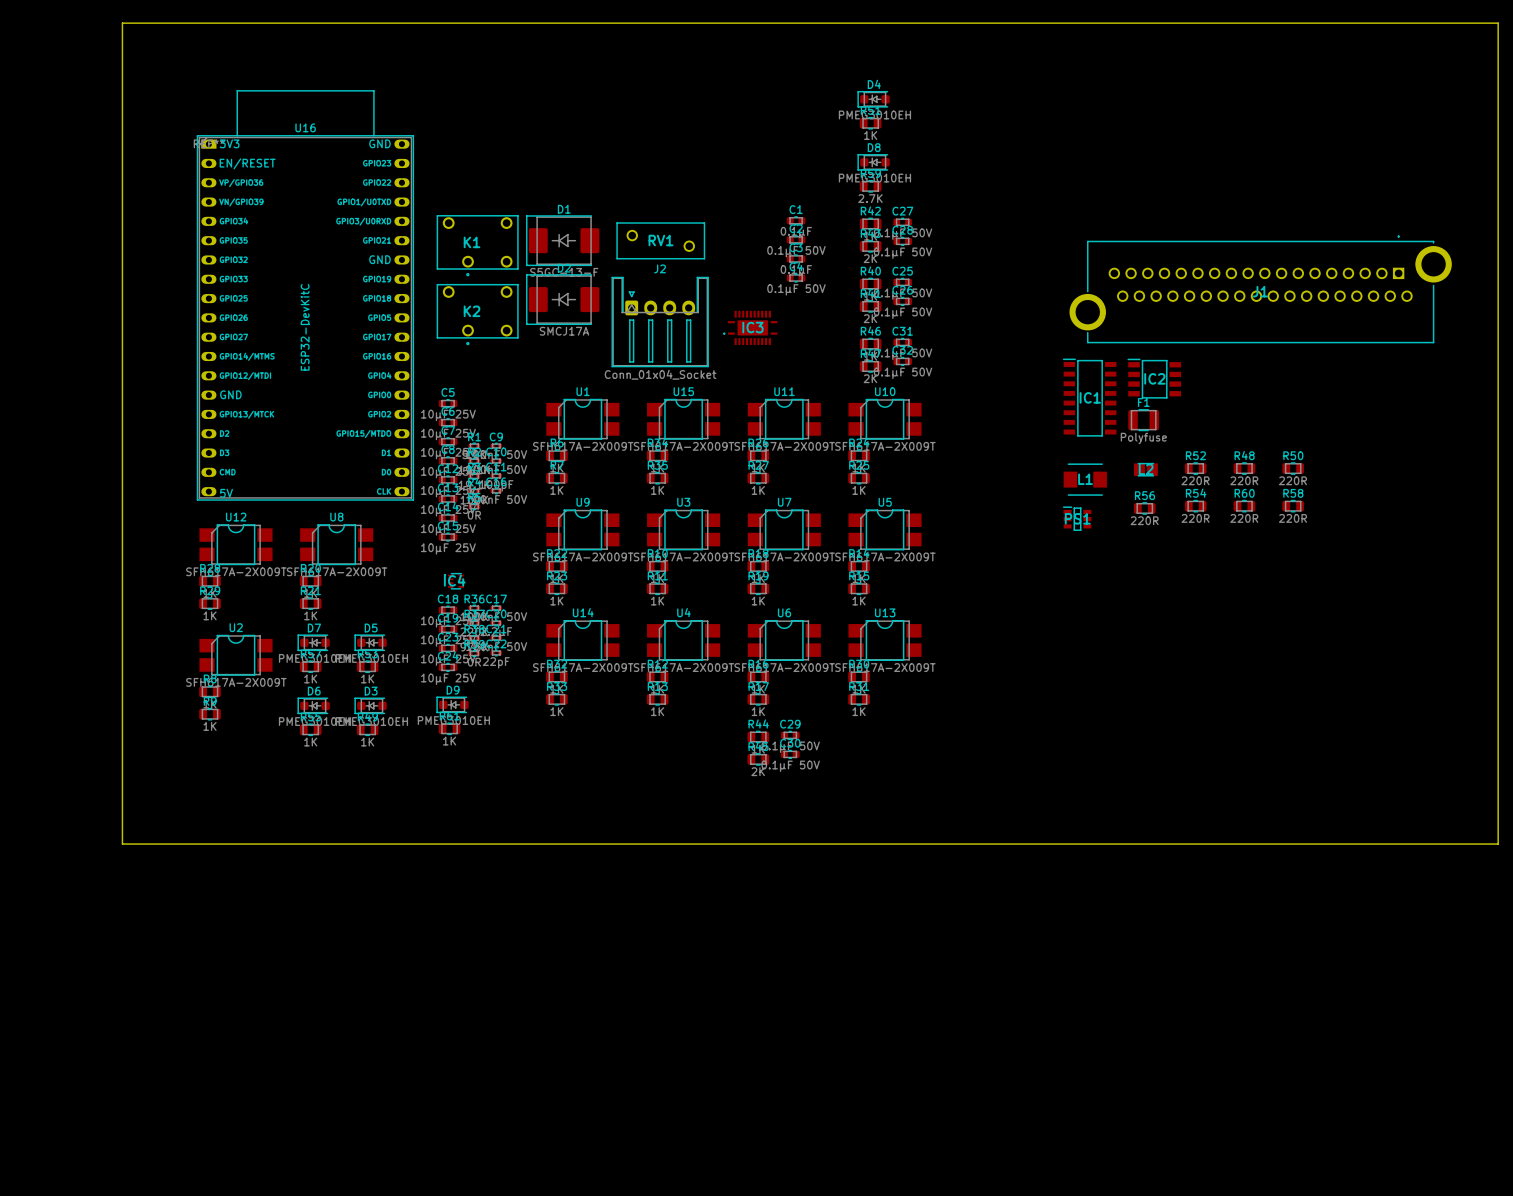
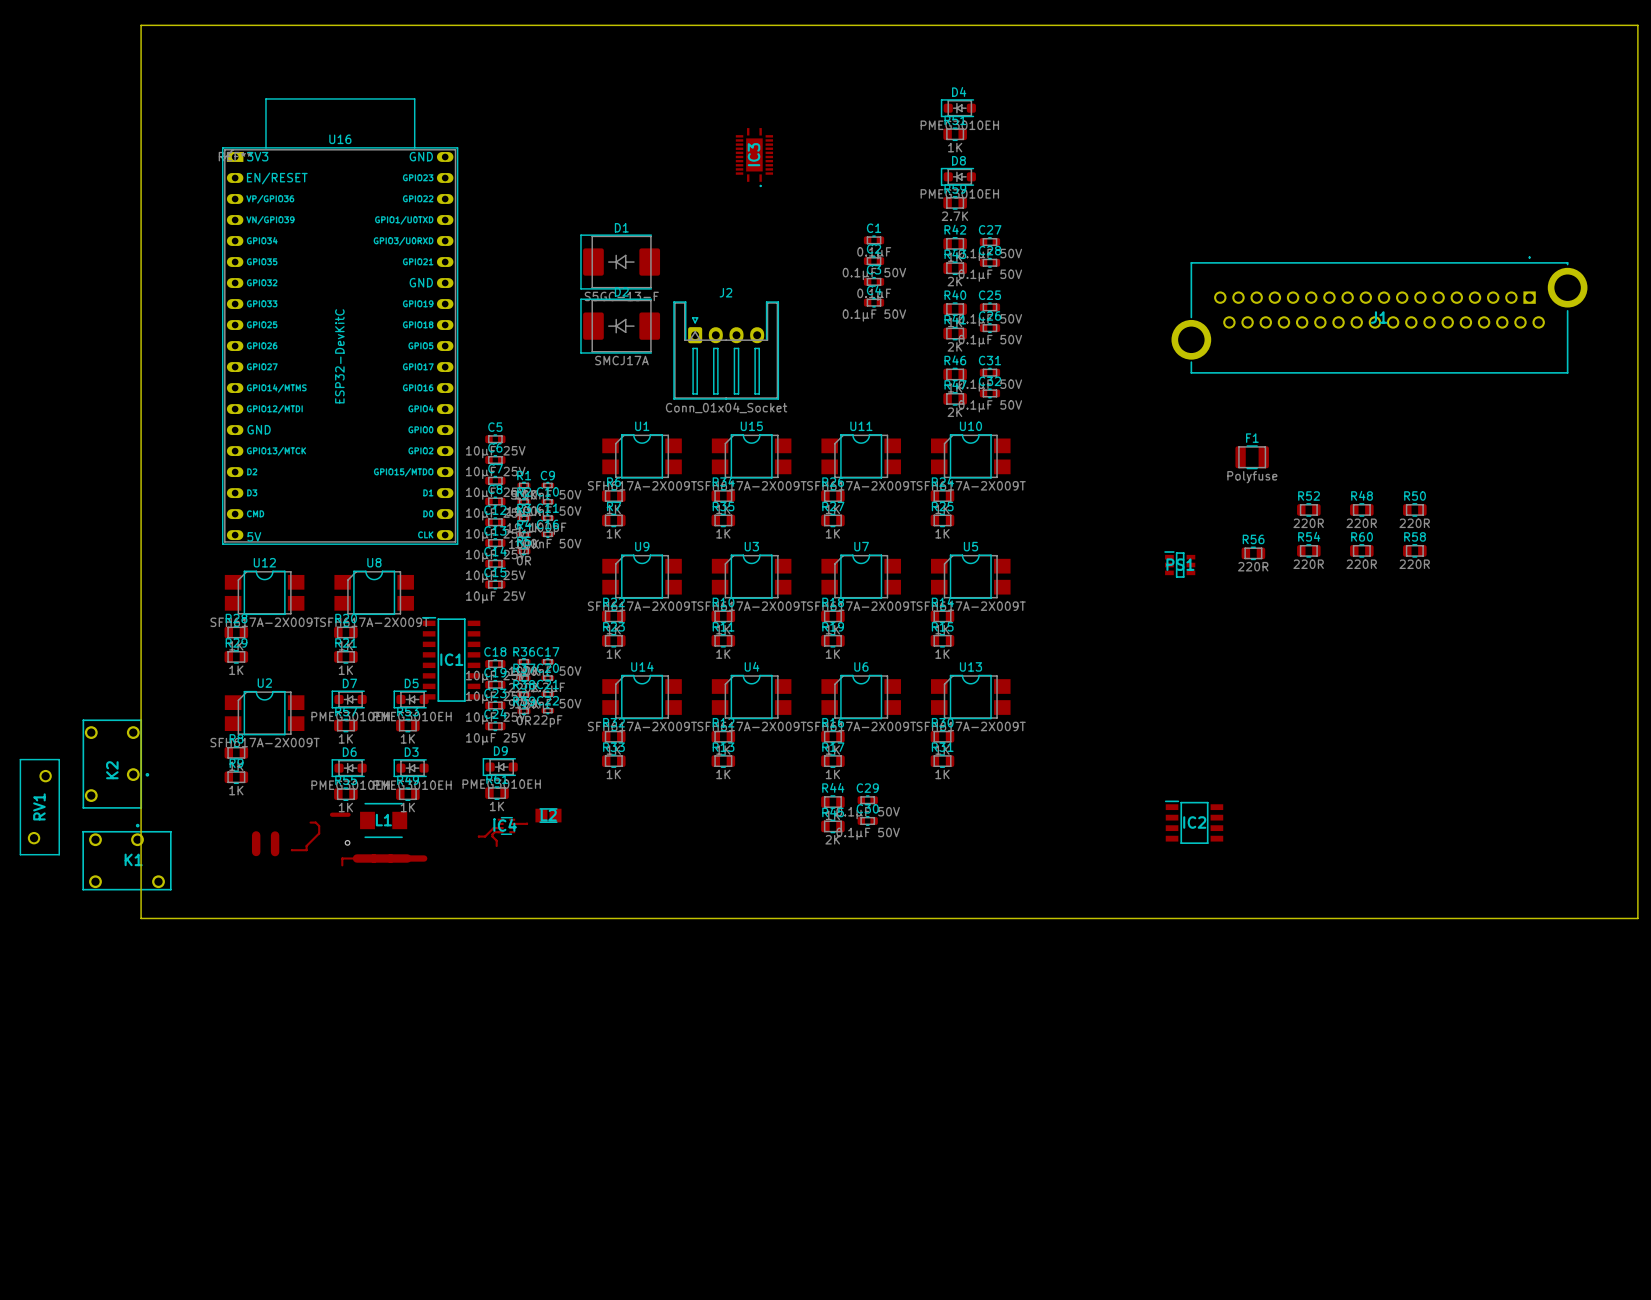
RV1 rotation: 0° (660, 240) -> 90° clockwise (39, 807)
RV1 position: (660, 240) -> (39, 807)
K1 rotation: 0° (477, 245) -> 180° (126, 857)
K1 position: (477, 245) -> (126, 857)
K2 rotation: 0° (477, 314) -> 90° counterclockwise (115, 764)
K2 position: (477, 314) -> (115, 764)
IC3 rotation: 0° (750, 327) -> 90° counterclockwise (754, 157)
IC3 position: (750, 327) -> (754, 157)
IC2 position: (1154, 378) -> (1194, 822)
IC1 position: (1089, 397) -> (451, 659)
L2 position: (1145, 469) -> (548, 815)
L1 position: (1085, 479) -> (383, 820)
IC4 position: (454, 581) -> (504, 825)
track: none -> (332, 814) (348, 814)
track: none -> (310, 822) (315, 822) (319, 826) (319, 833) (306, 846) (306, 850) (291, 850)
track: none -> (527, 823) (512, 823)
track: none -> (500, 828) (493, 828) (485, 836) (478, 836)
track: none -> (500, 832) (494, 832) (492, 834) (496, 840) (496, 846)
track: none -> (256, 835) (256, 851)
track: none -> (275, 835) (275, 852)
via: none -> (347, 842)
track: none -> (342, 858) (424, 858)
track: none -> (342, 858) (342, 865)

